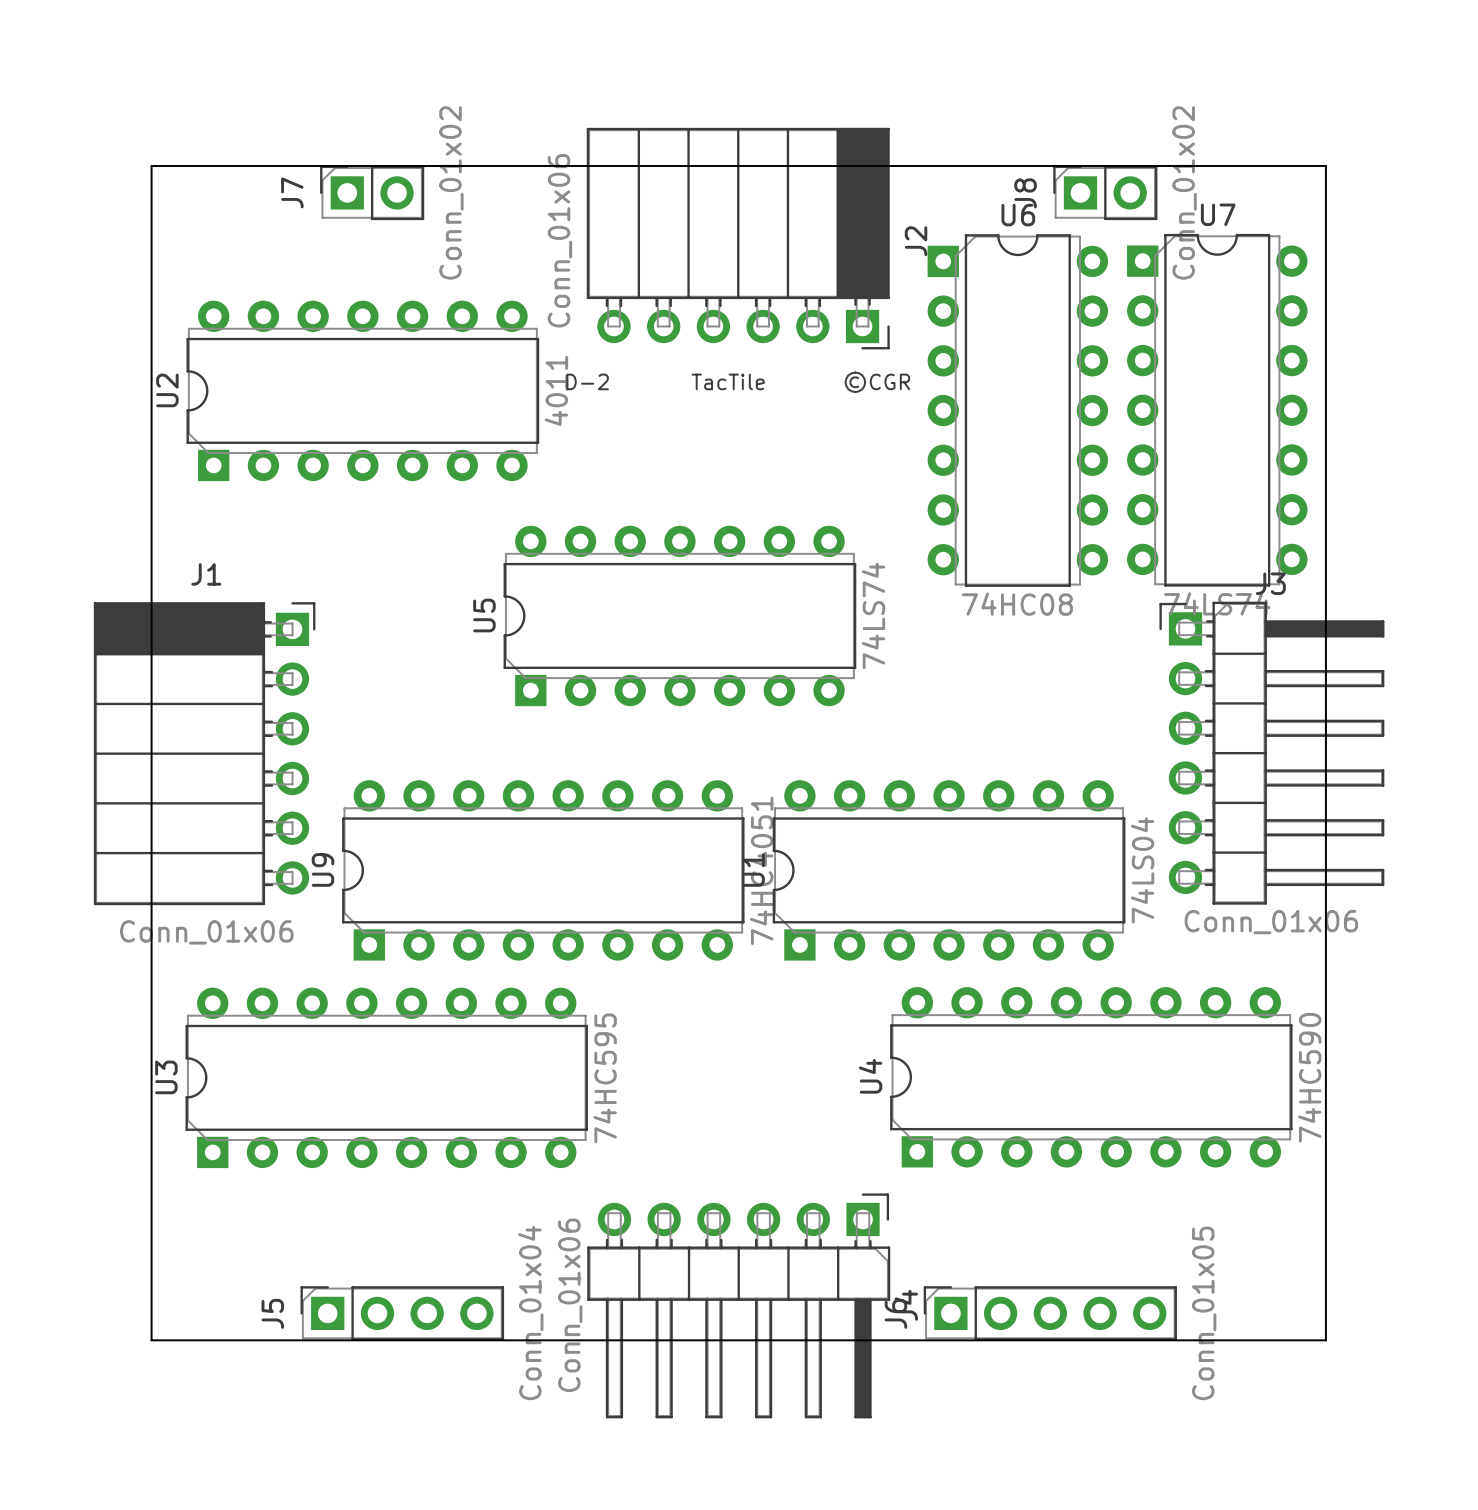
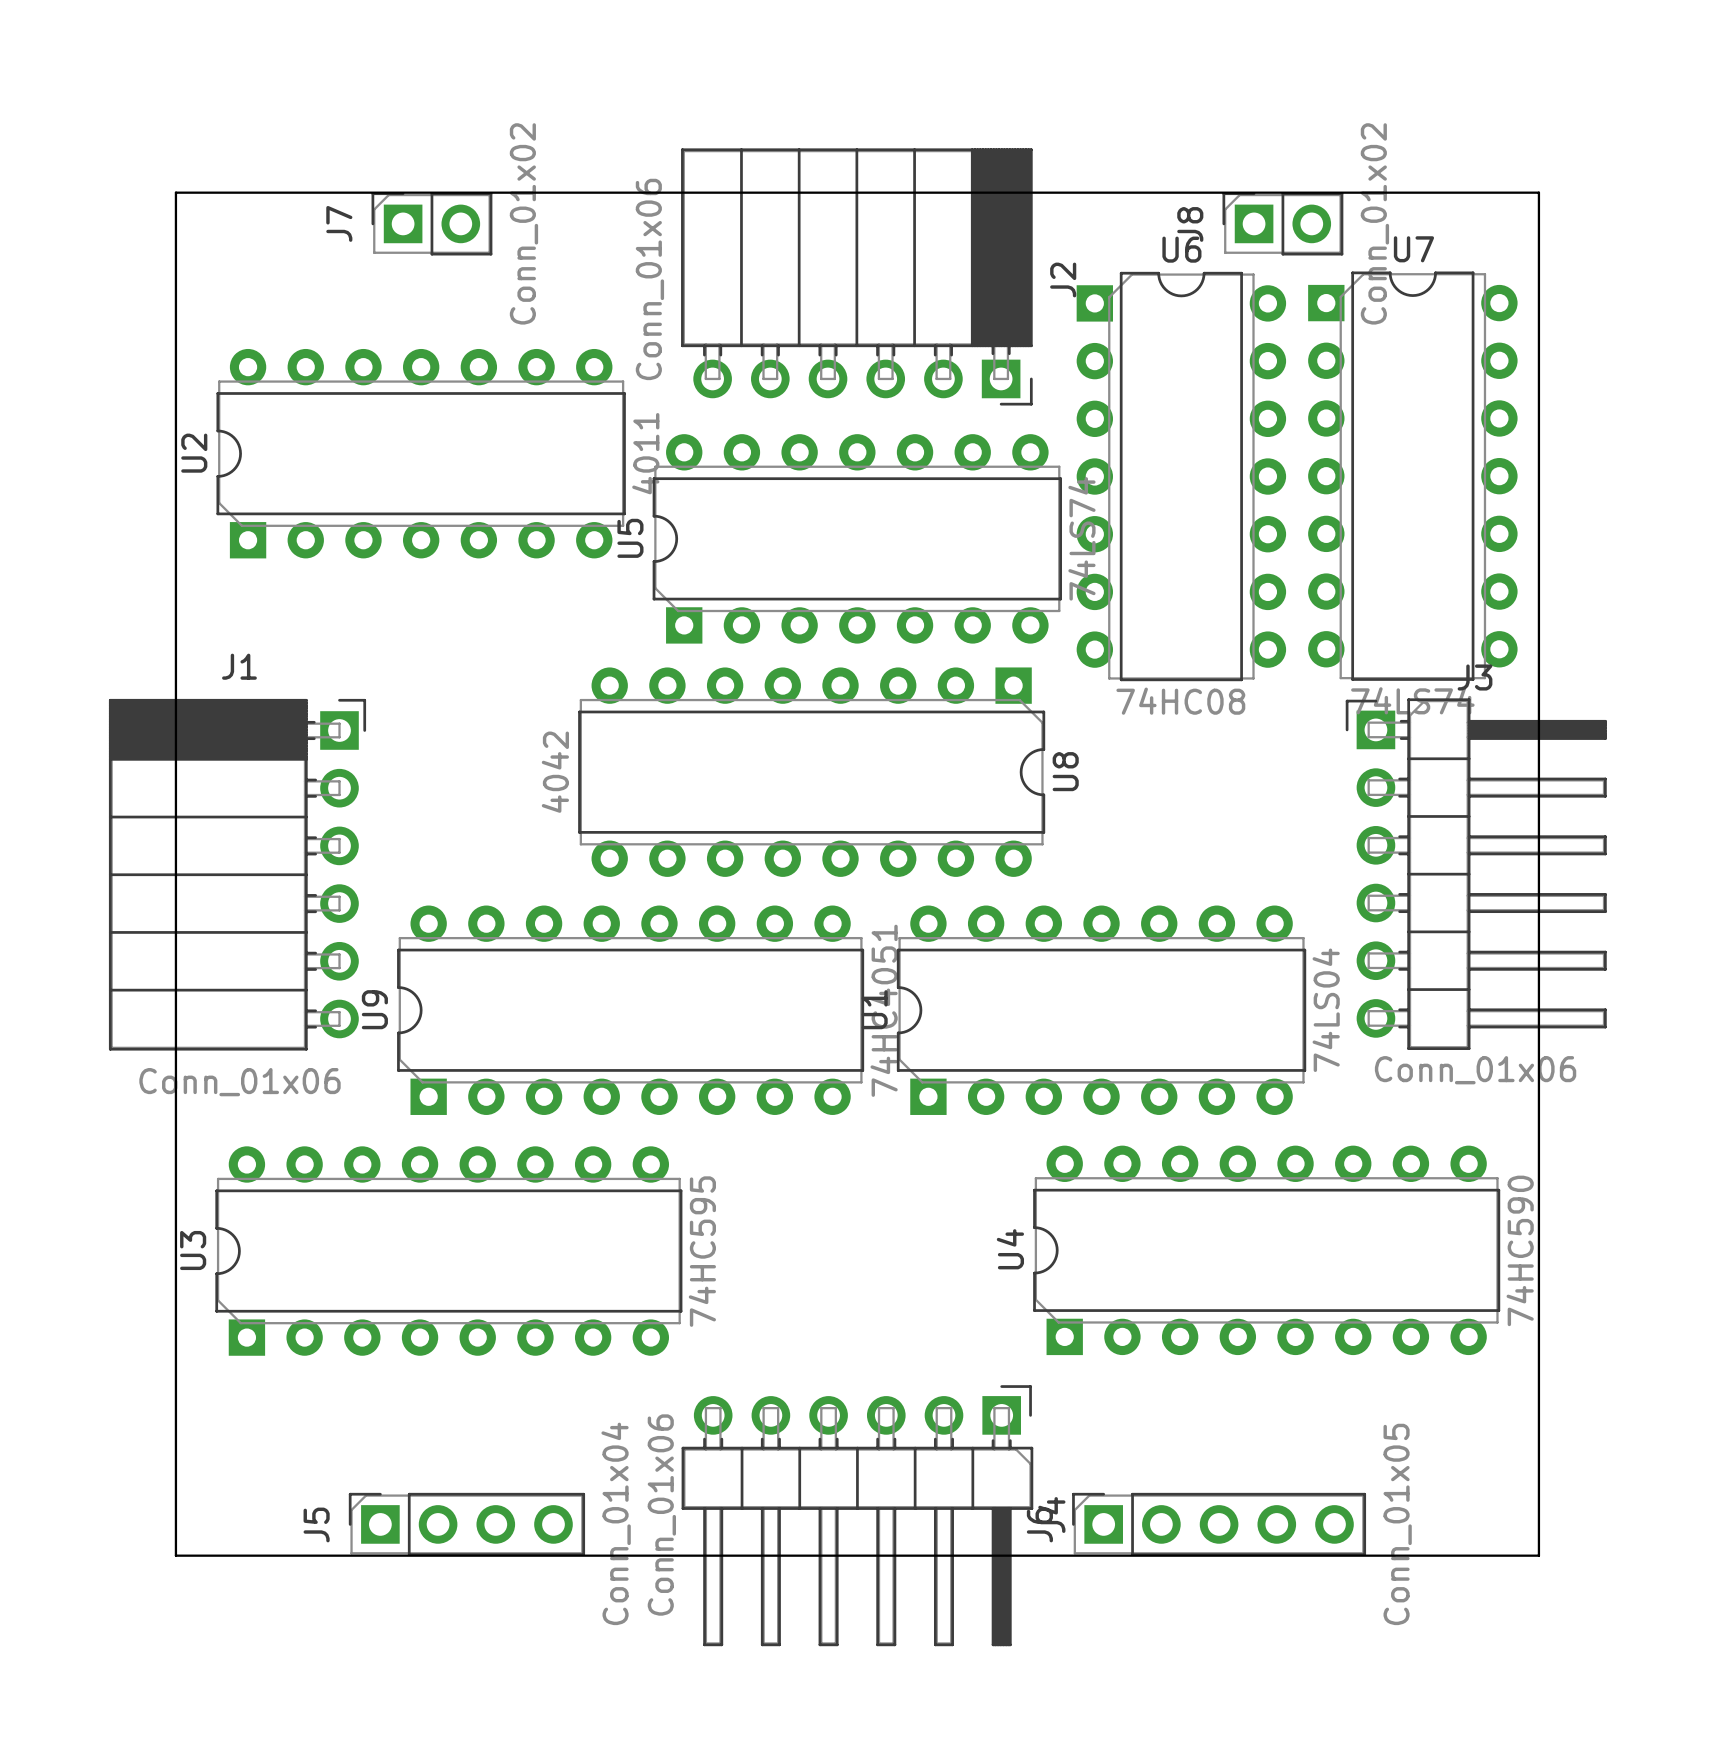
text: D-2 (587, 381) -> none
text: TacTile (728, 381) -> none
text: ©CGR (877, 382) -> none
U5 position: (679, 615) -> (857, 538)
U8: none -> 4042 (811, 772)

